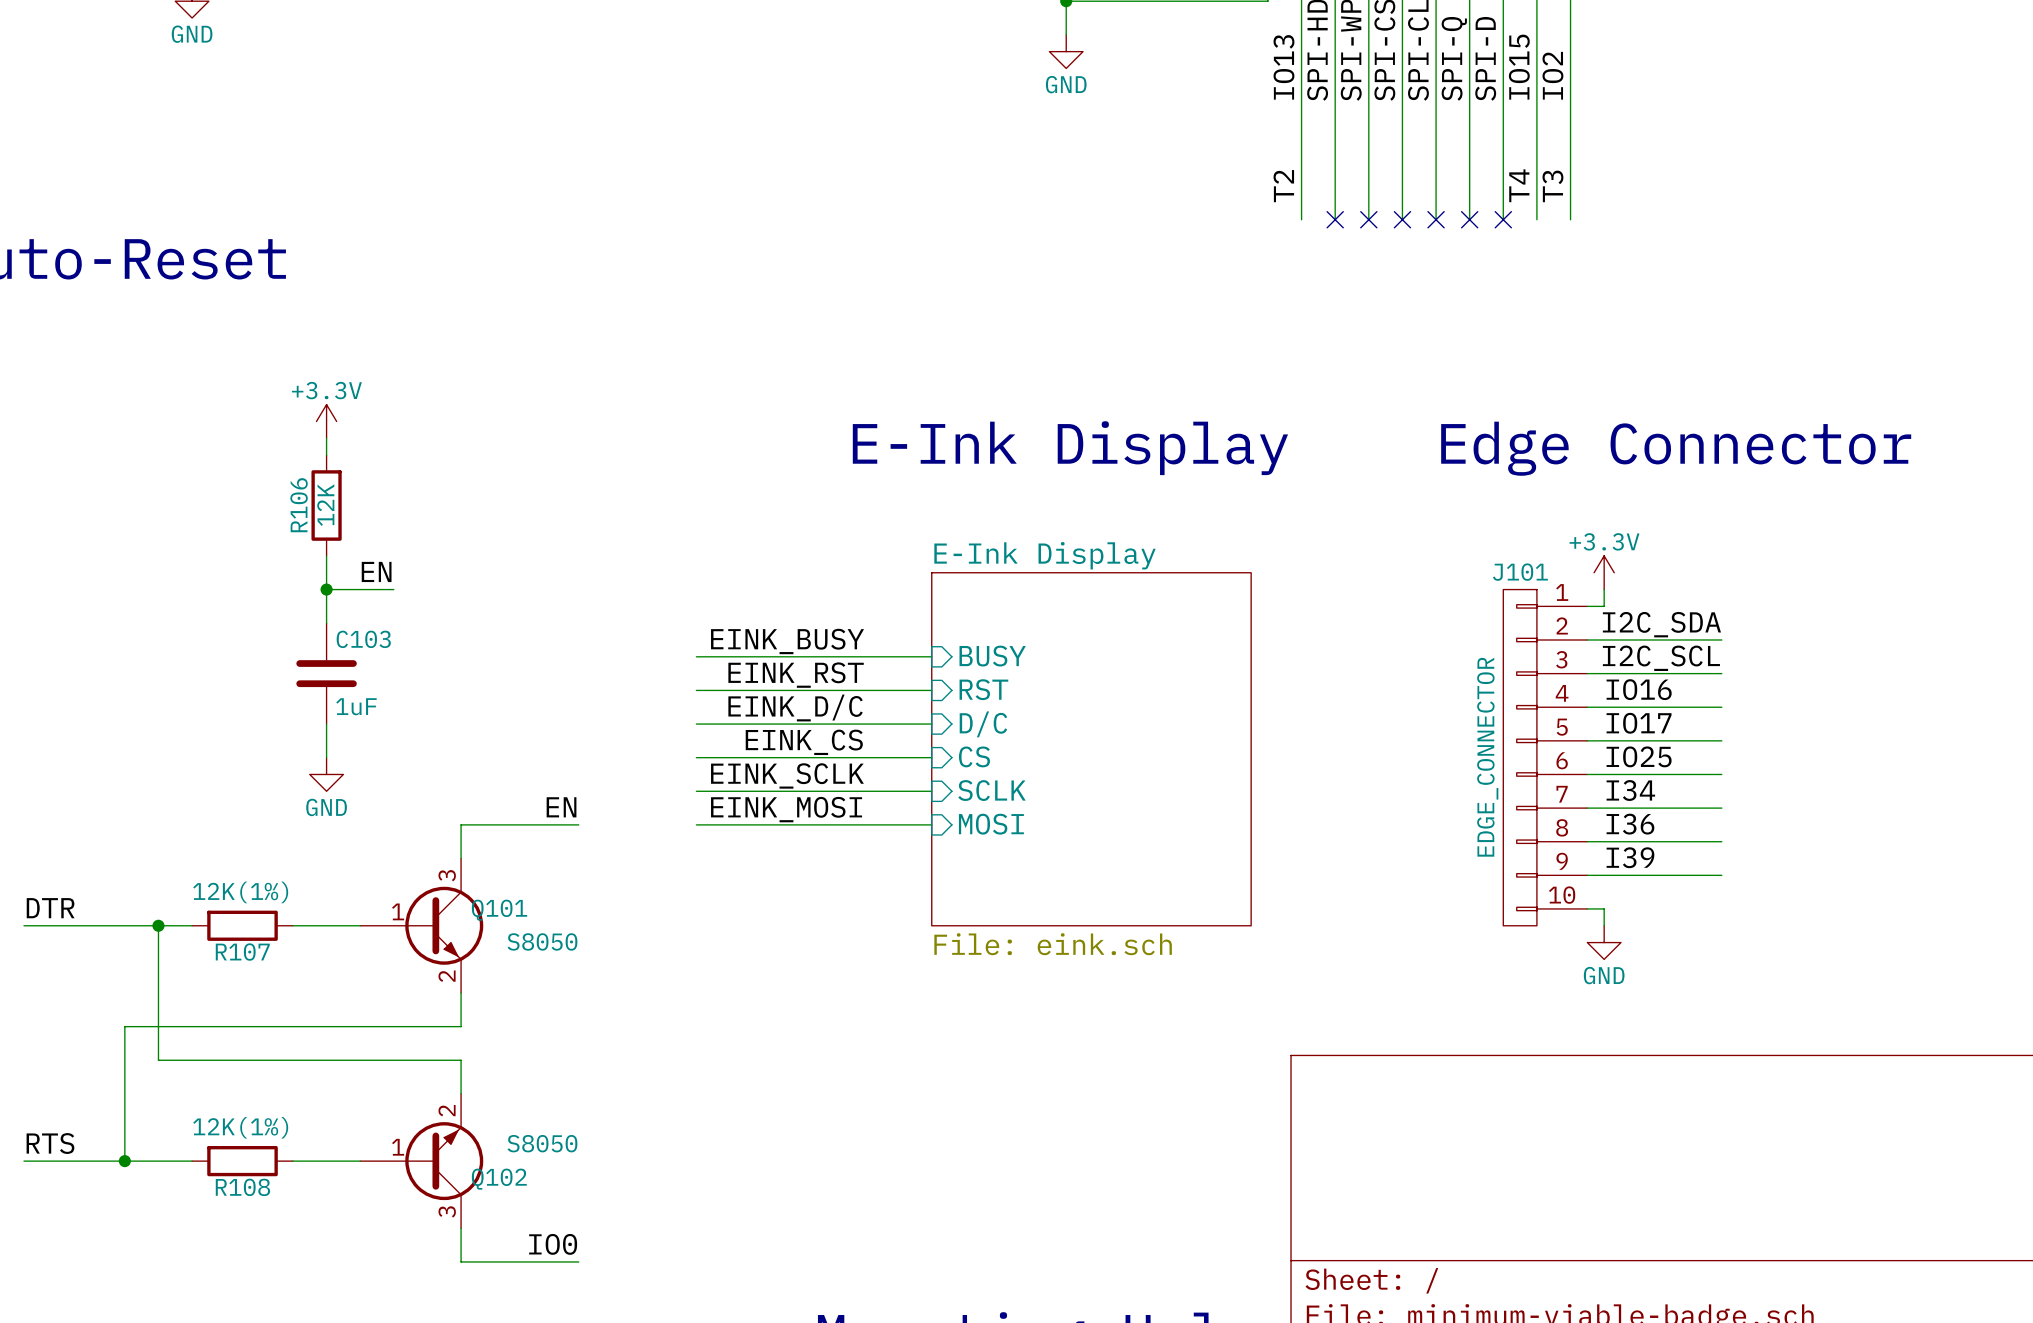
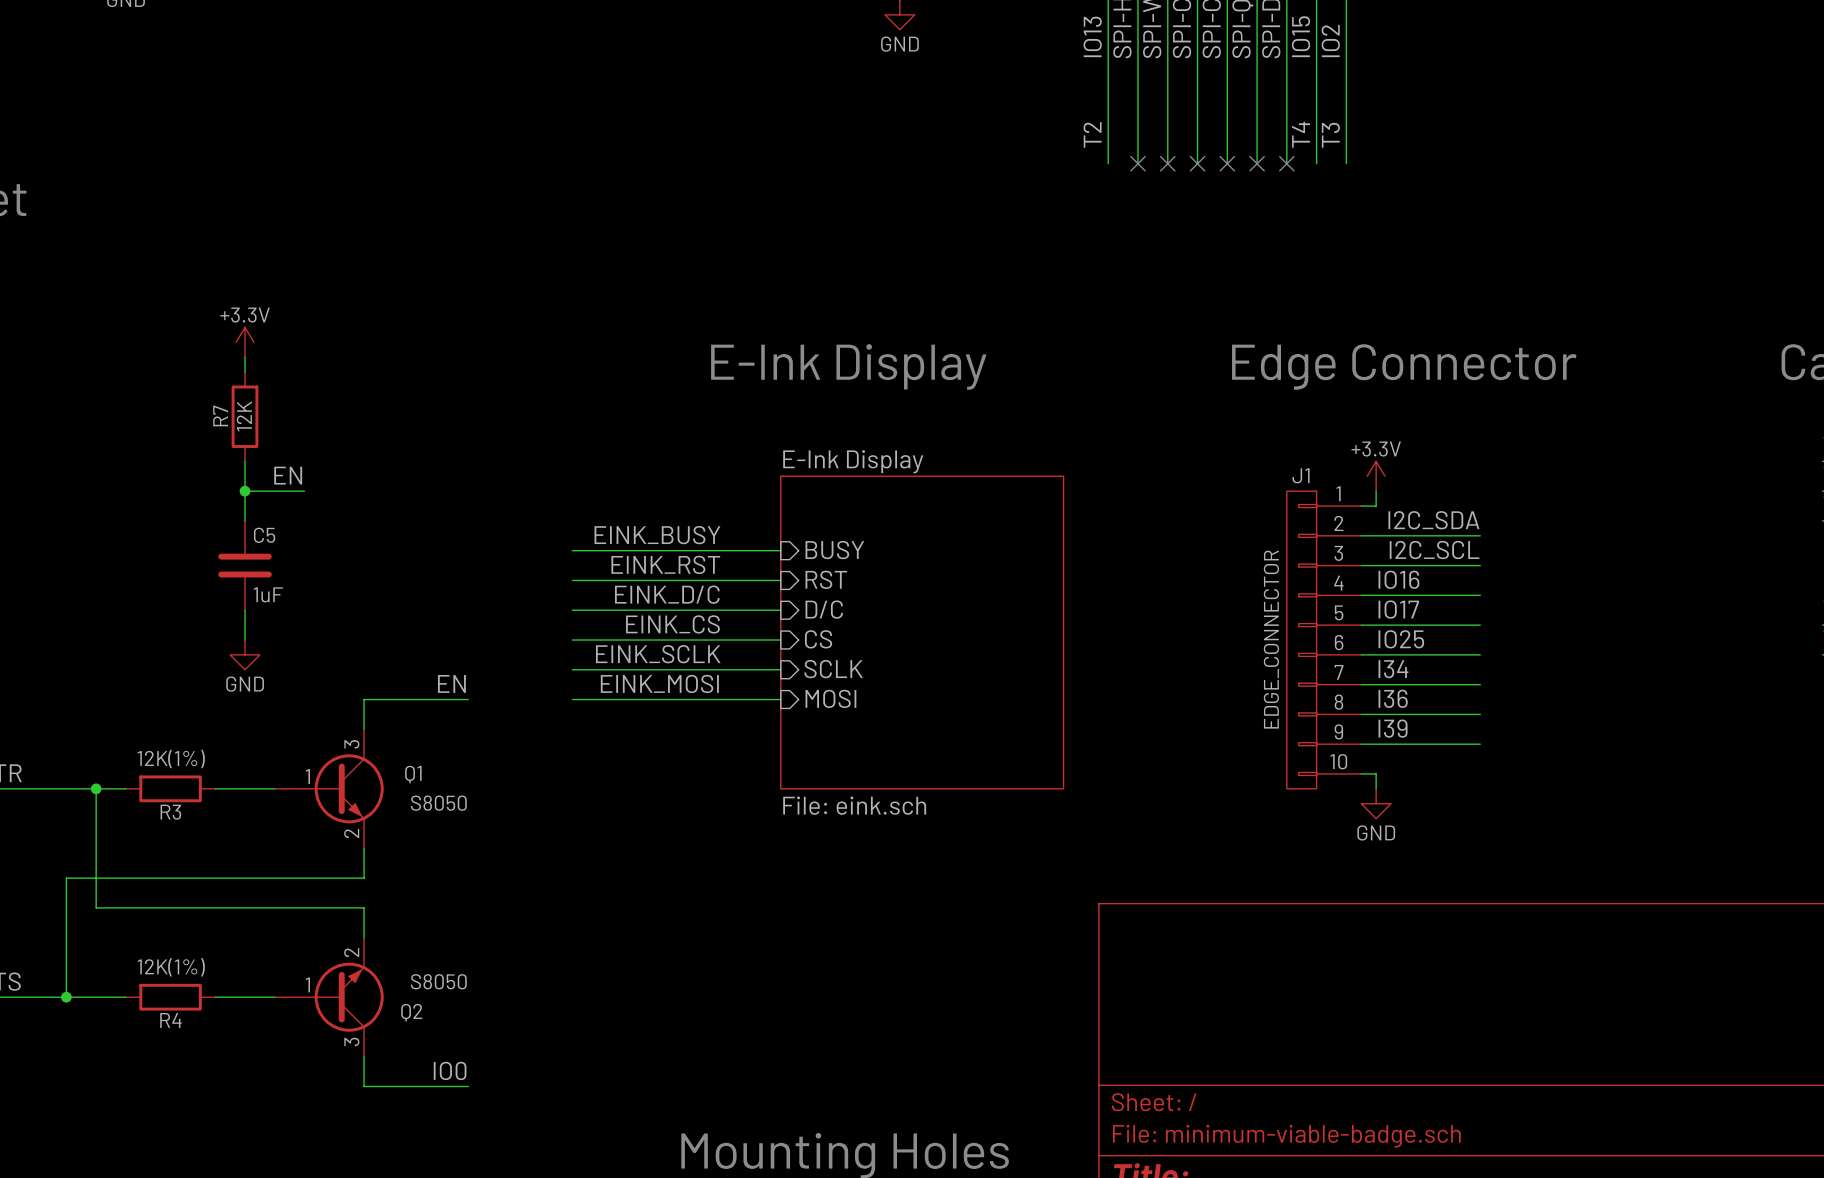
R106 name: R106 (299, 505) -> R7 (220, 415)
J101 name: J101 (1520, 572) -> J1 (1301, 475)
C103 name: C103 (363, 639) -> C5 (264, 535)
Q101 name: Q101 (499, 910) -> Q1 (413, 774)
R107 name: R107 (242, 952) -> R3 (170, 812)
Q102 name: Q102 (499, 1179) -> Q2 (411, 1012)
R108 name: R108 (242, 1187) -> R4 (170, 1020)

